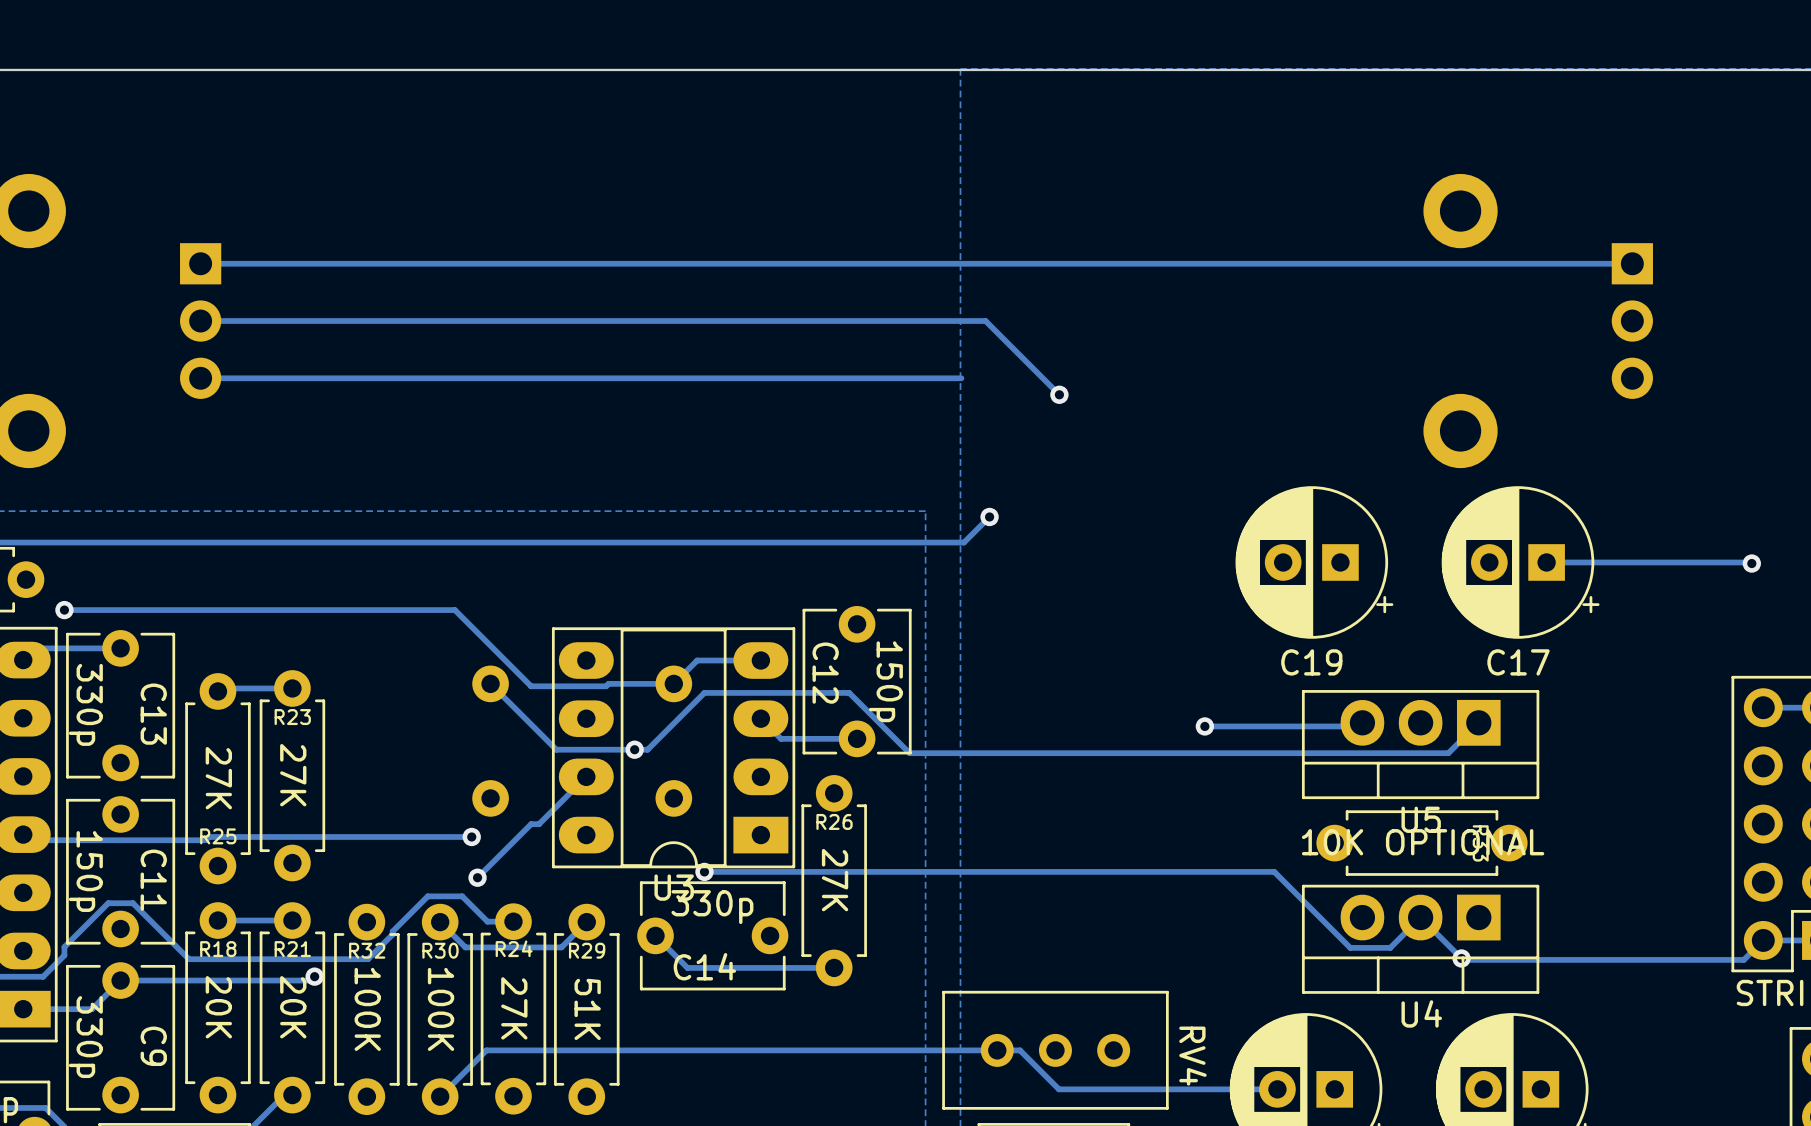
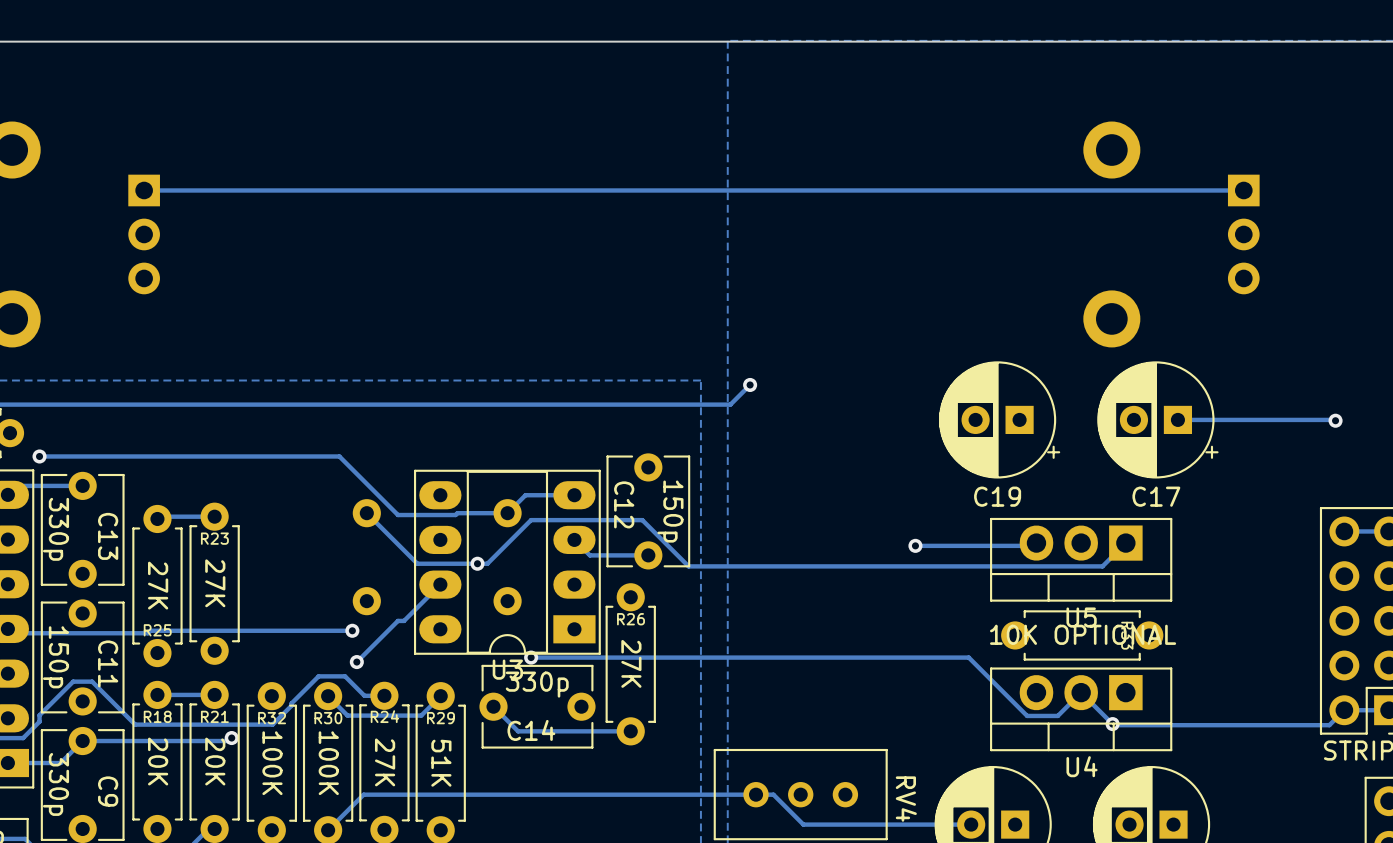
track: (200, 321) (985, 321) (1059, 394) -> none
track: (961, 378) (200, 378) -> none
via: (1059, 394) -> none

